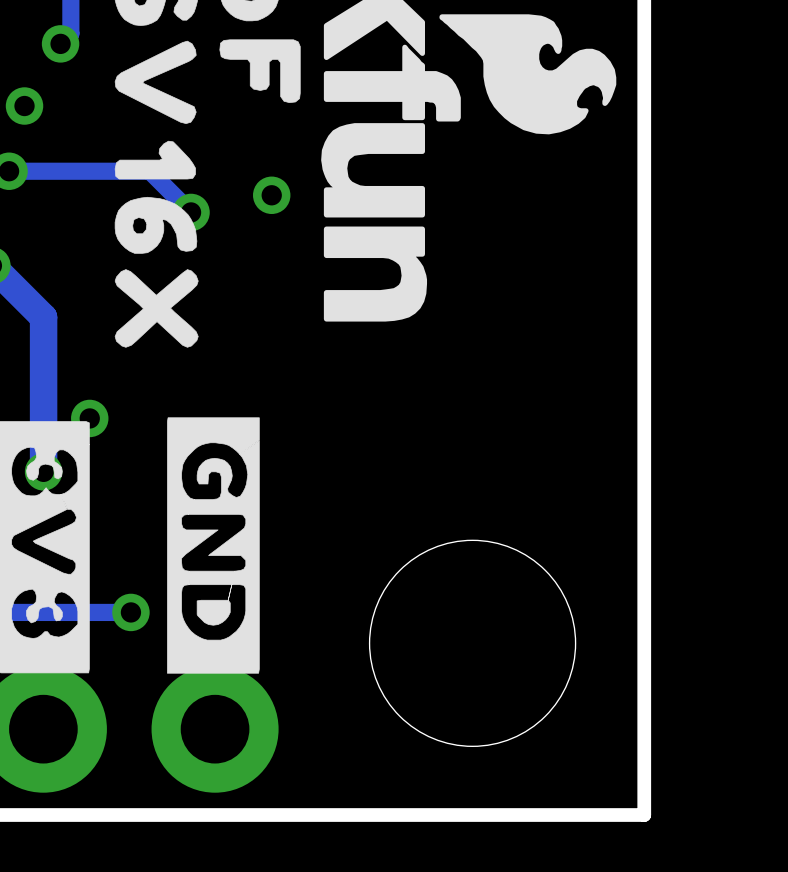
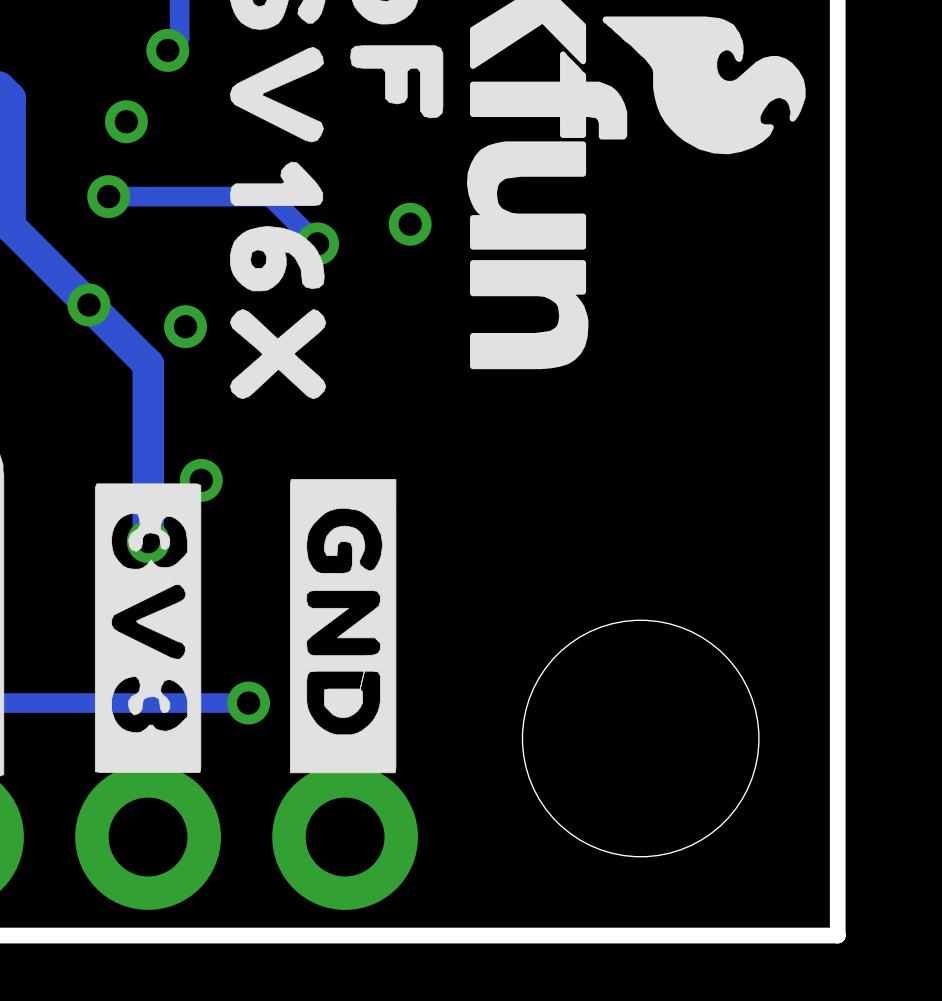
via: none -> (185, 326)

